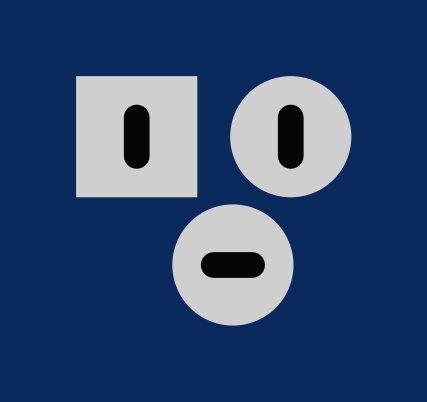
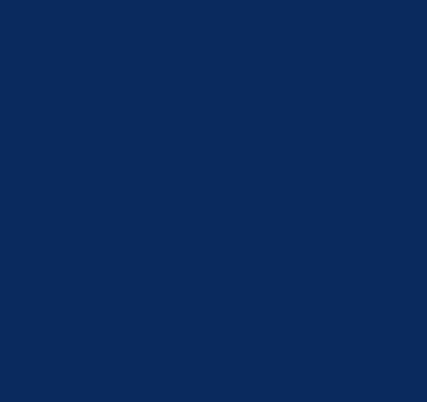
part: (213, 200) -> none

